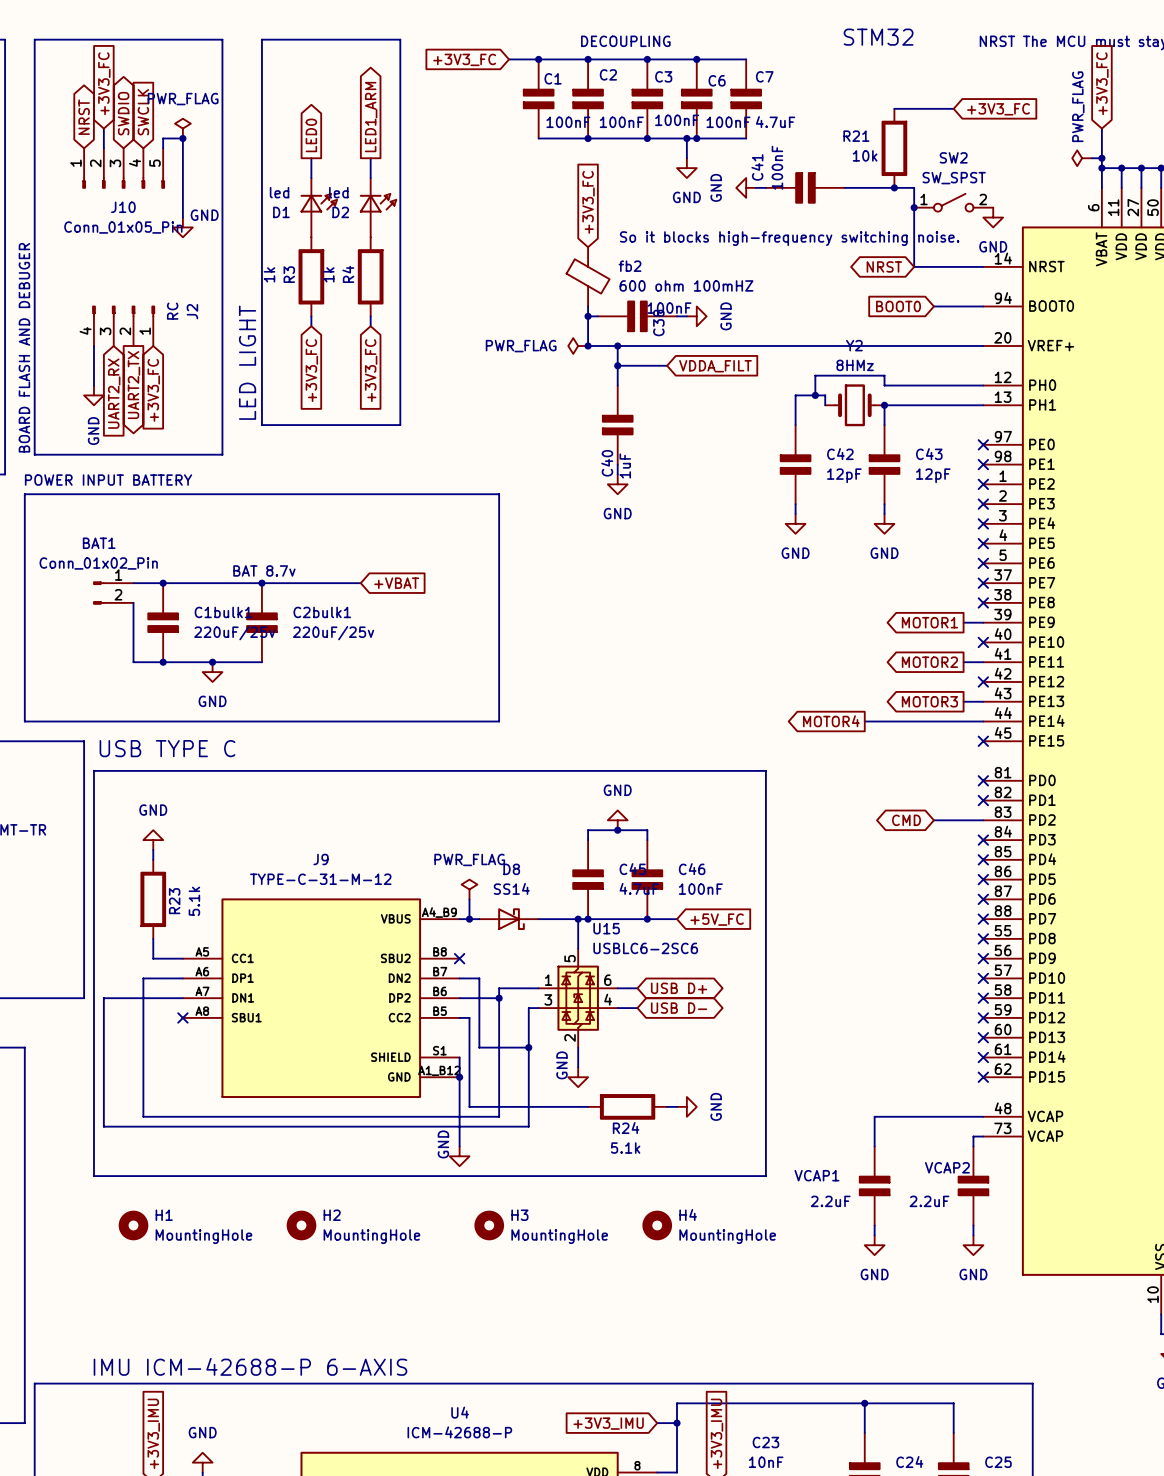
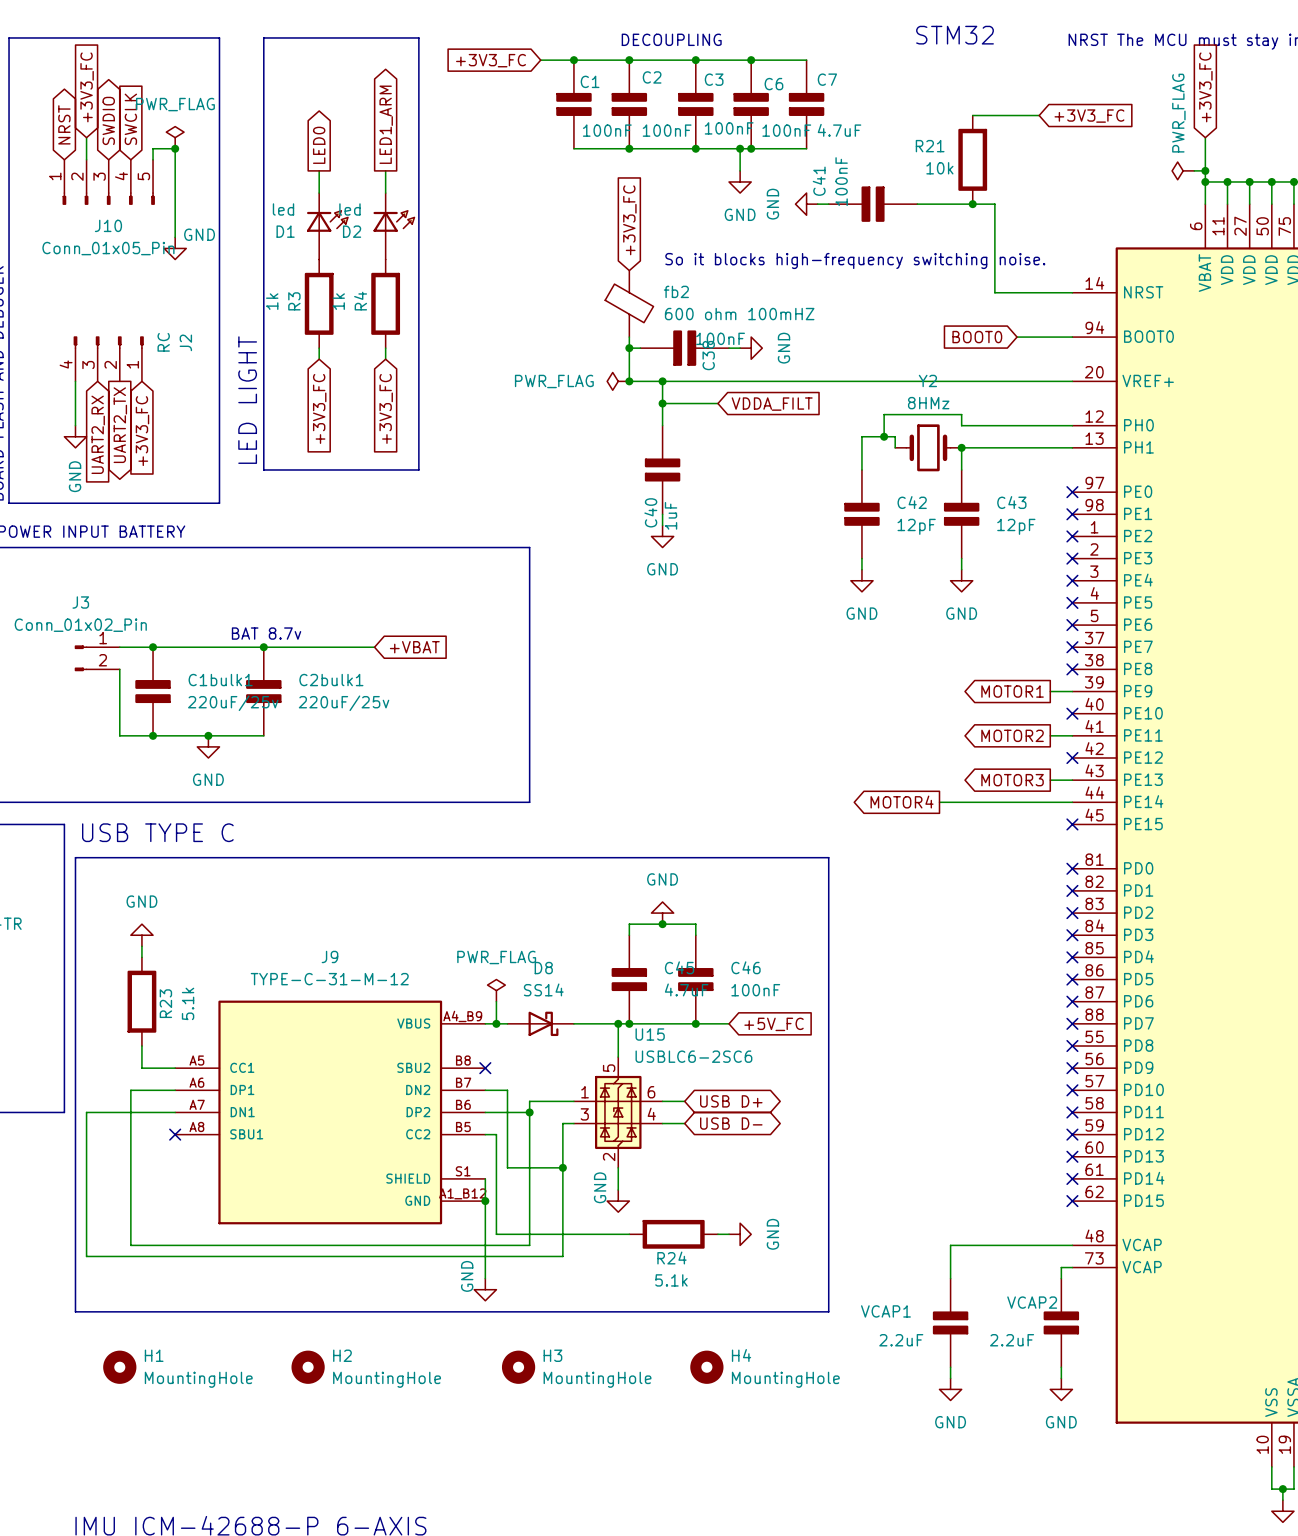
SW2: SW_SPST (953, 202) -> none
junction: (914, 207) -> none
power symbol: GND (993, 217) -> none
global label: NRST (884, 266) -> none
BAT1 name: BAT1 (99, 543) -> J3 (80, 602)
global label: CMD (906, 820) -> none
wire: (933, 820) (983, 820) -> none
no-connect mark: none -> (1072, 913)

